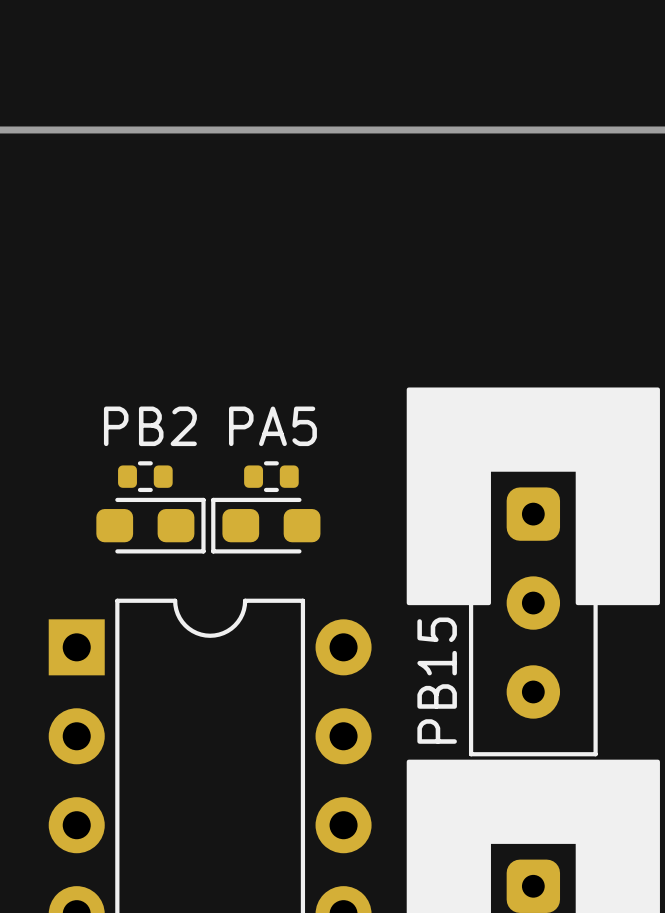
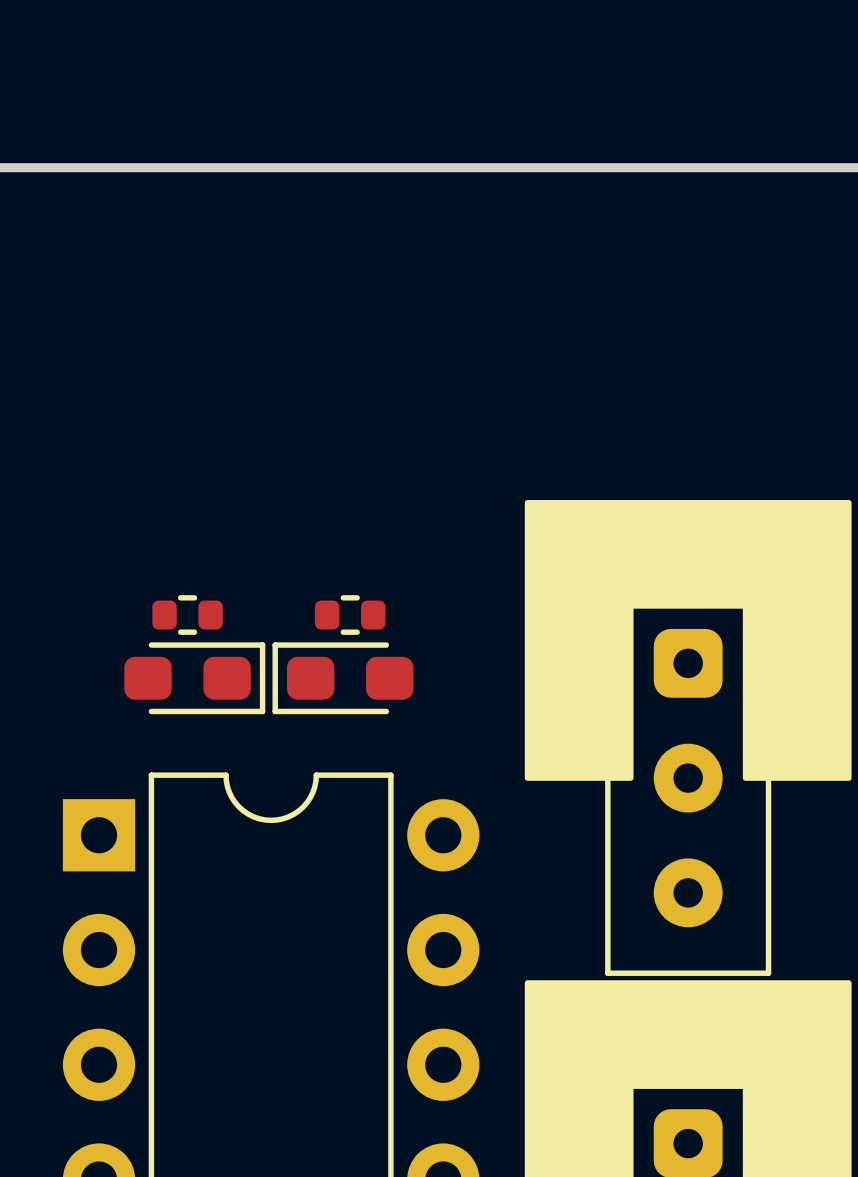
text: PB2 (150, 426) -> none
text: PA5 (272, 426) -> none
text: PB15 (437, 680) -> none

